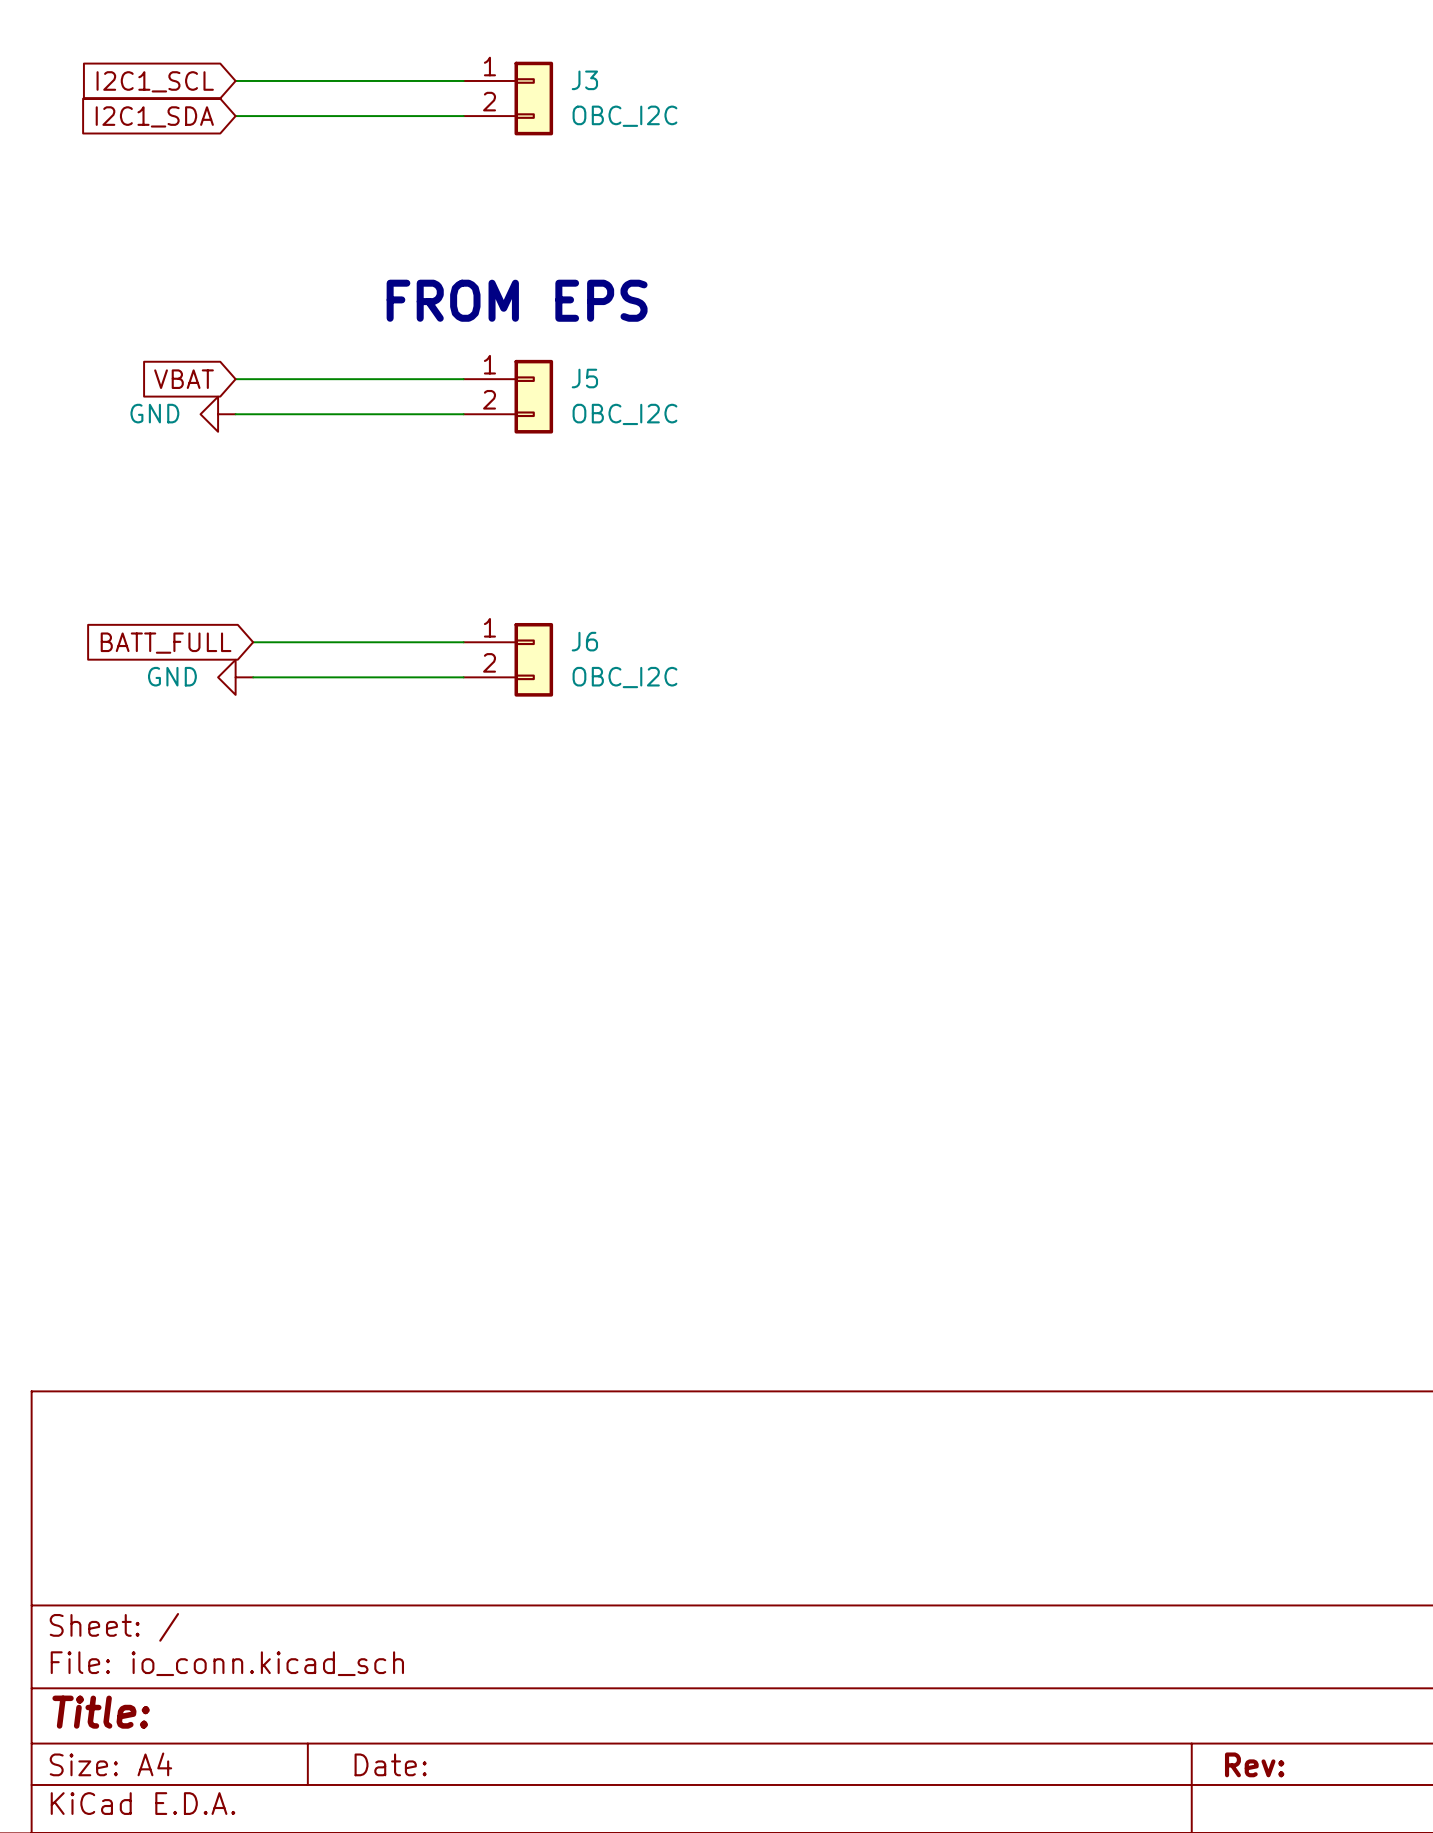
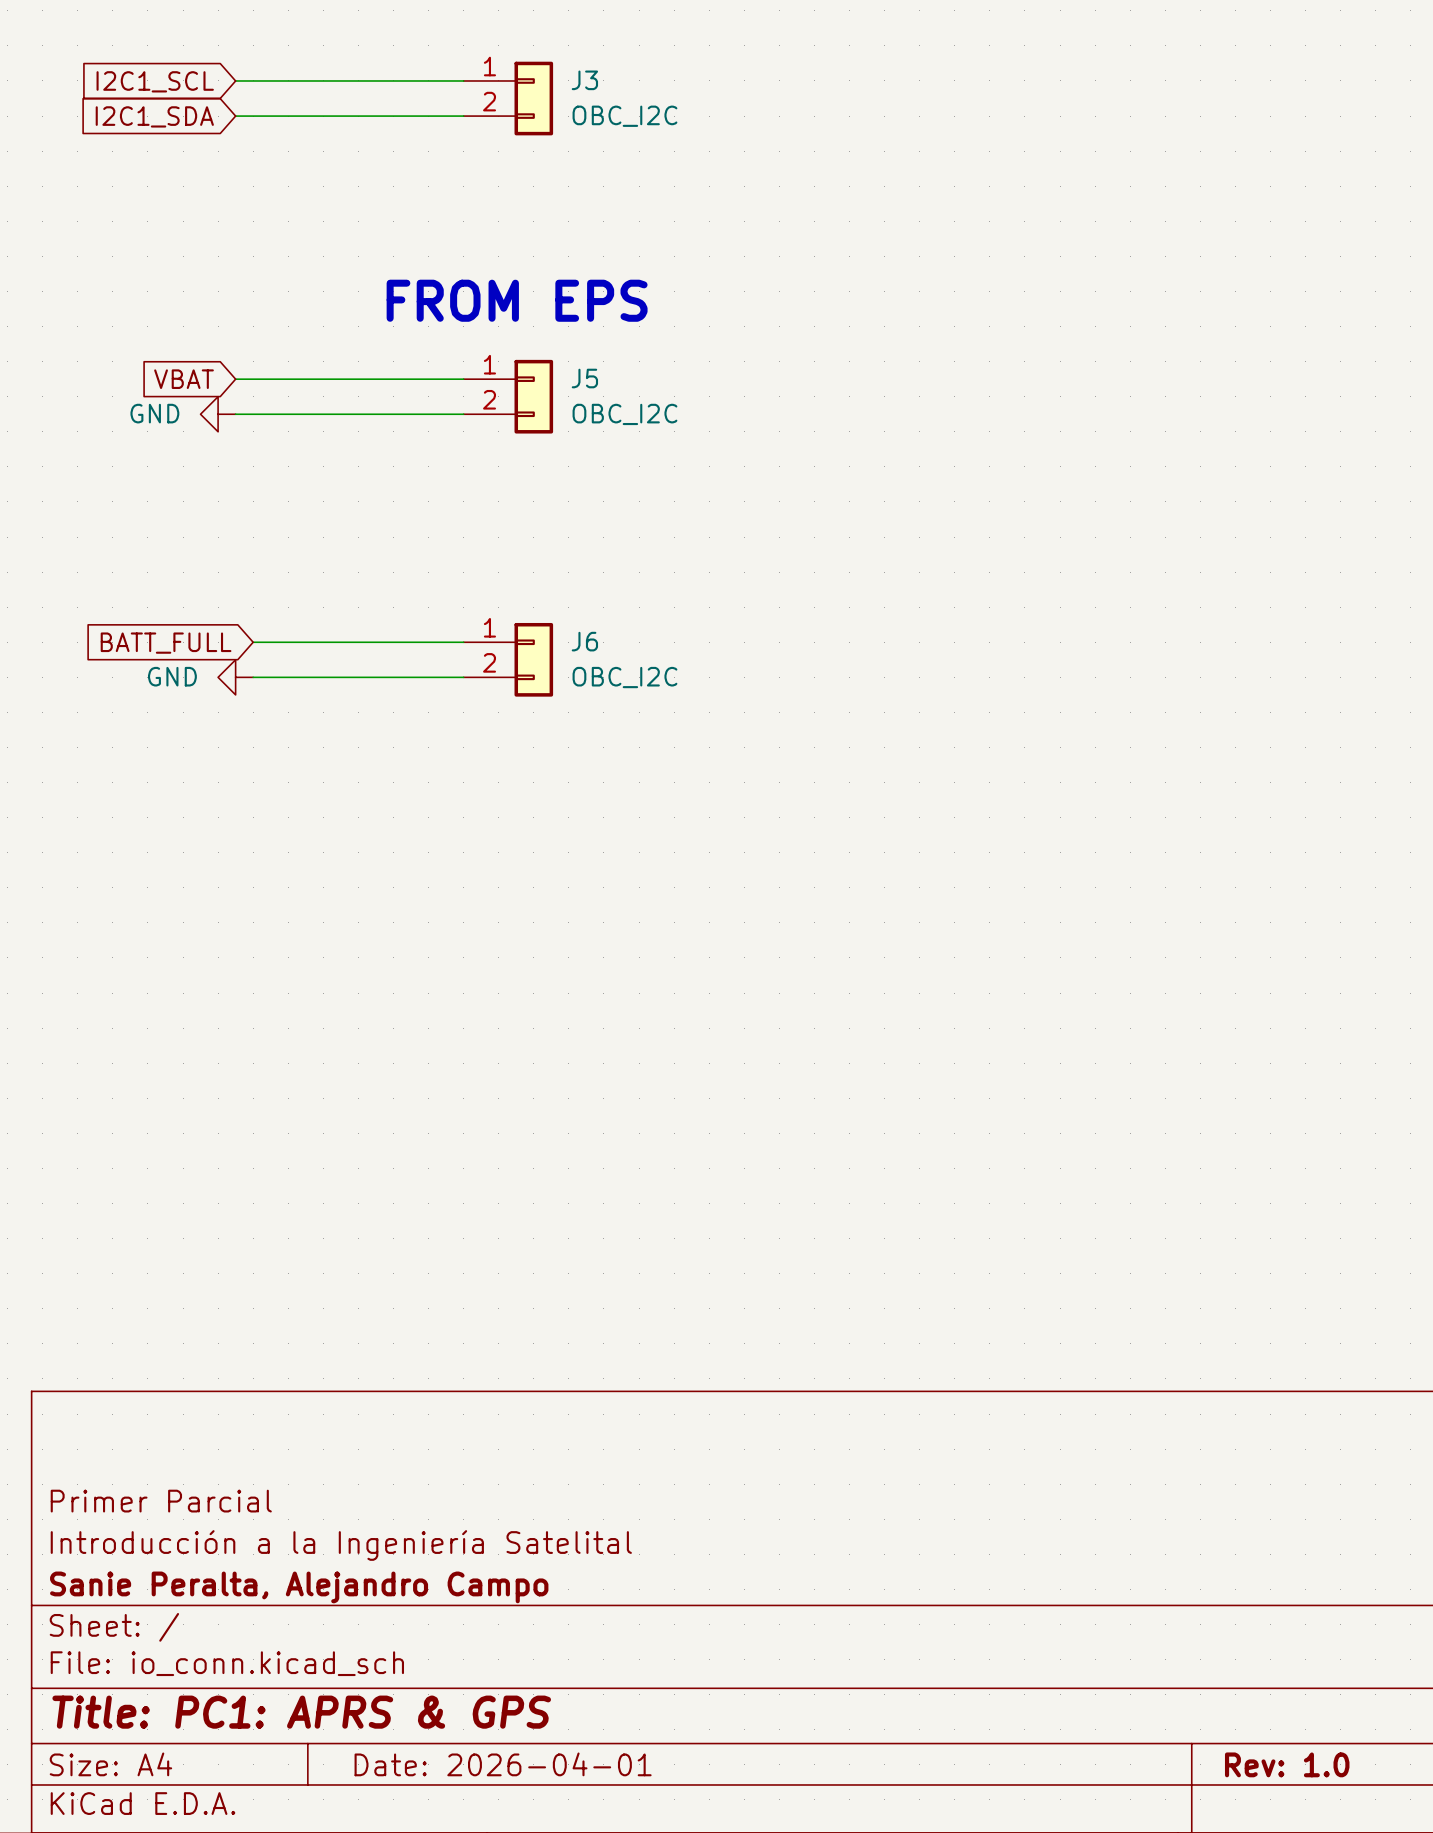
title block: none -> Primer Parcial (161, 1501)
title block: none -> Introducción a la Ingeniería Satelital (341, 1545)
title block: none -> Sanie Peralta, Alejandro Campo (299, 1587)
title block: Title: (101, 1712) -> Title: PC1: APRS & GPS (301, 1712)
title block: Date: (390, 1764) -> Date: 2026-04-01 (503, 1764)
title block: Rev: (1254, 1764) -> Rev: 1.0 (1287, 1764)

